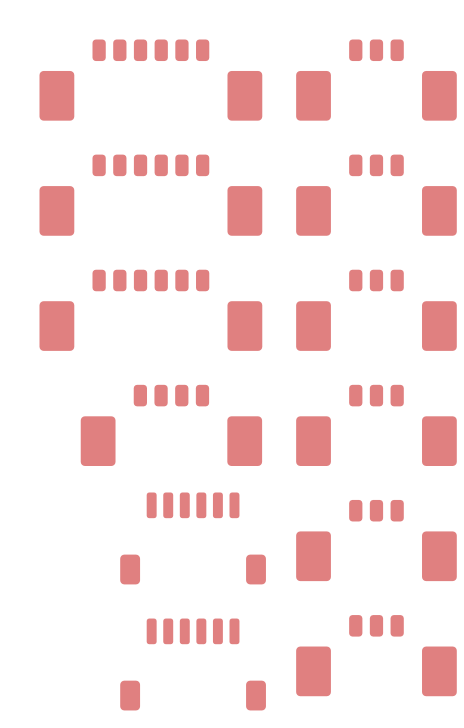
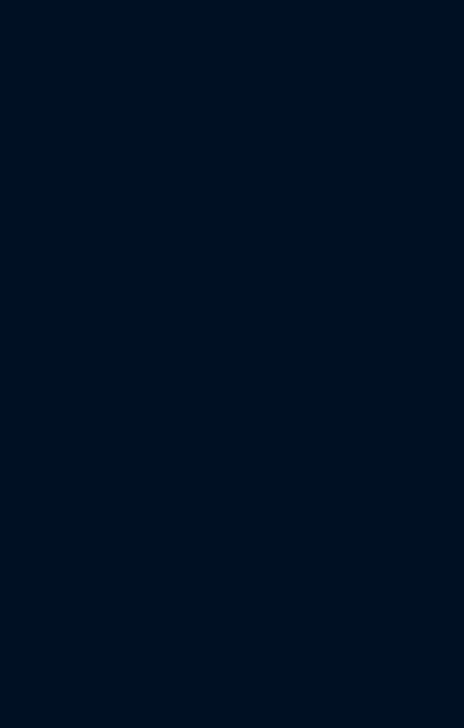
part: (150, 80) -> none
part: (376, 80) -> none
part: (150, 195) -> none
part: (376, 195) -> none
part: (150, 310) -> none
part: (376, 310) -> none
part: (171, 425) -> none
part: (376, 425) -> none
part: (193, 538) -> none
part: (376, 540) -> none
part: (376, 655) -> none
part: (193, 664) -> none

